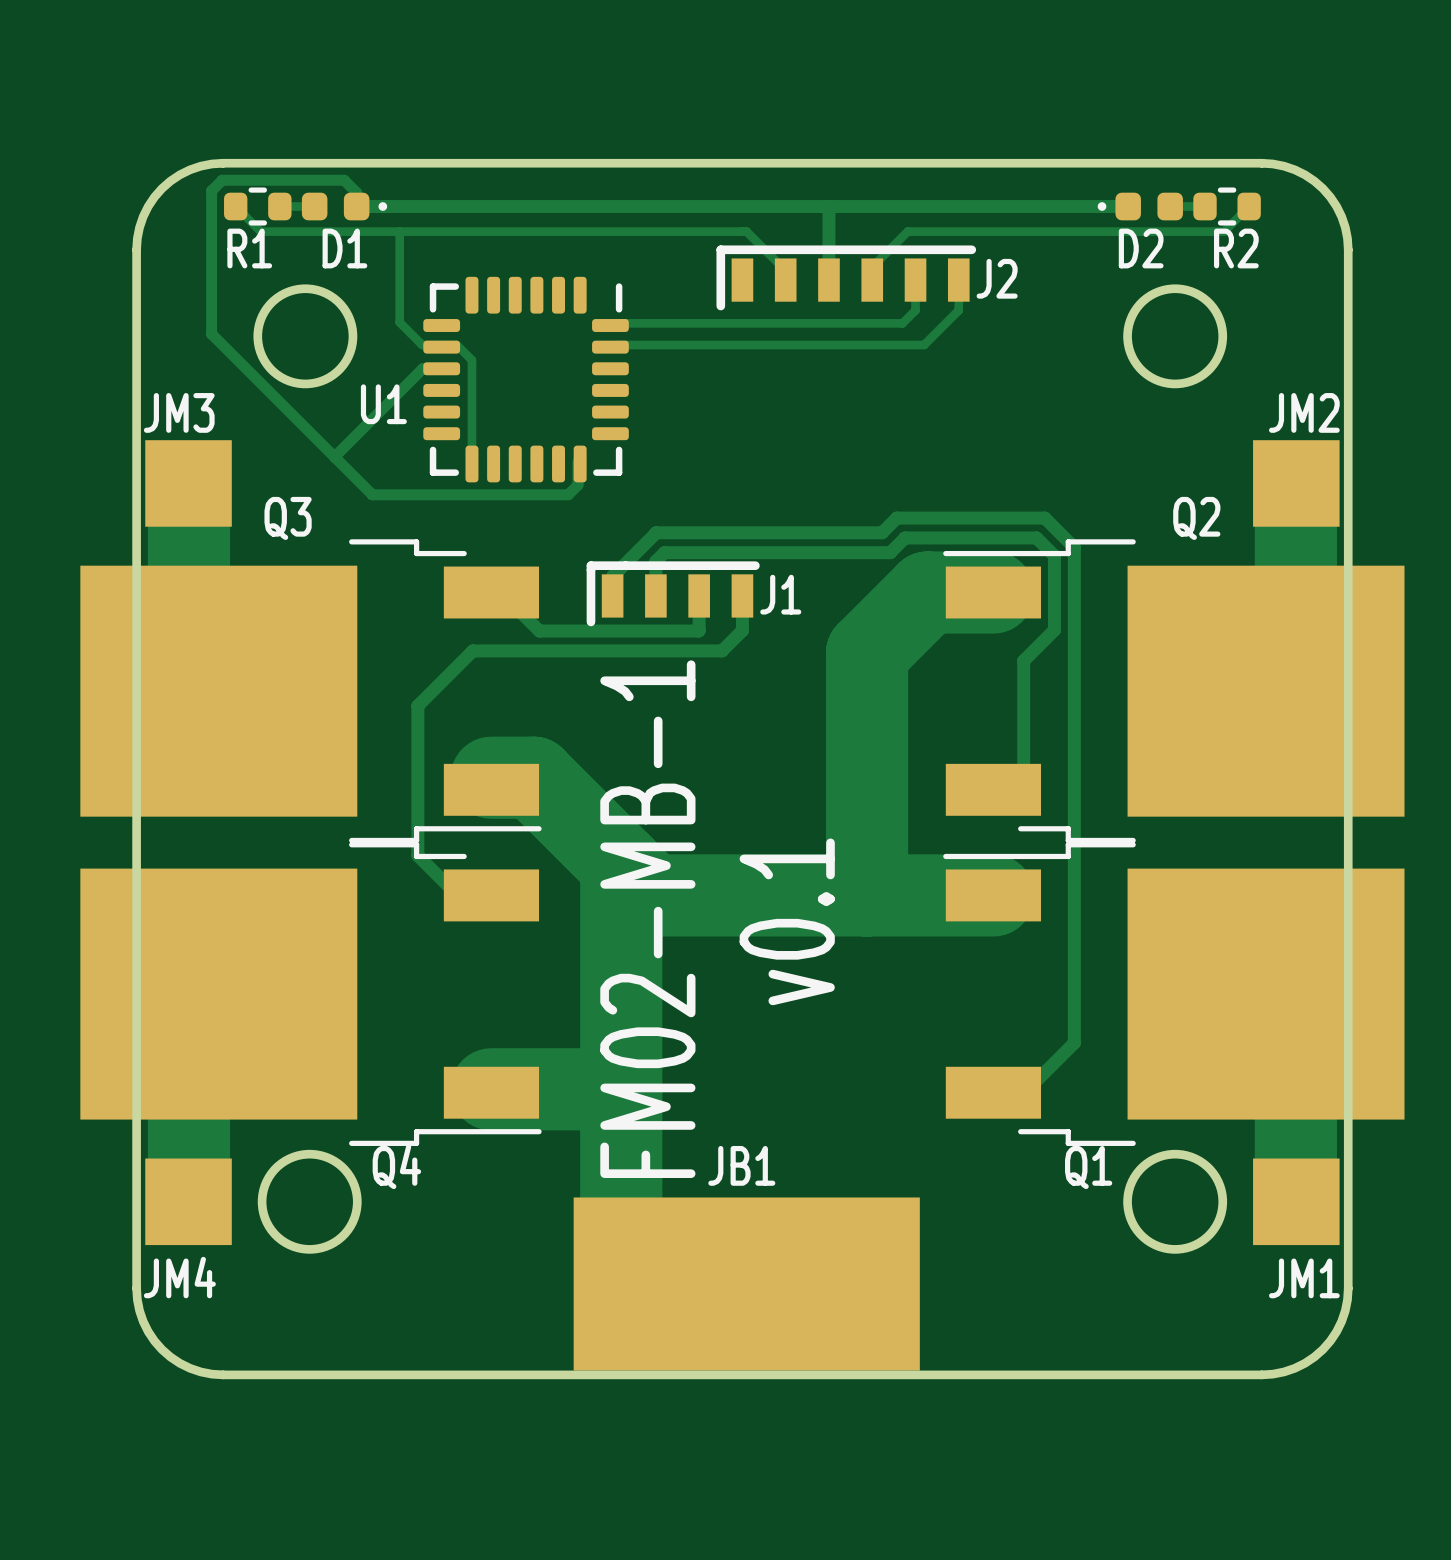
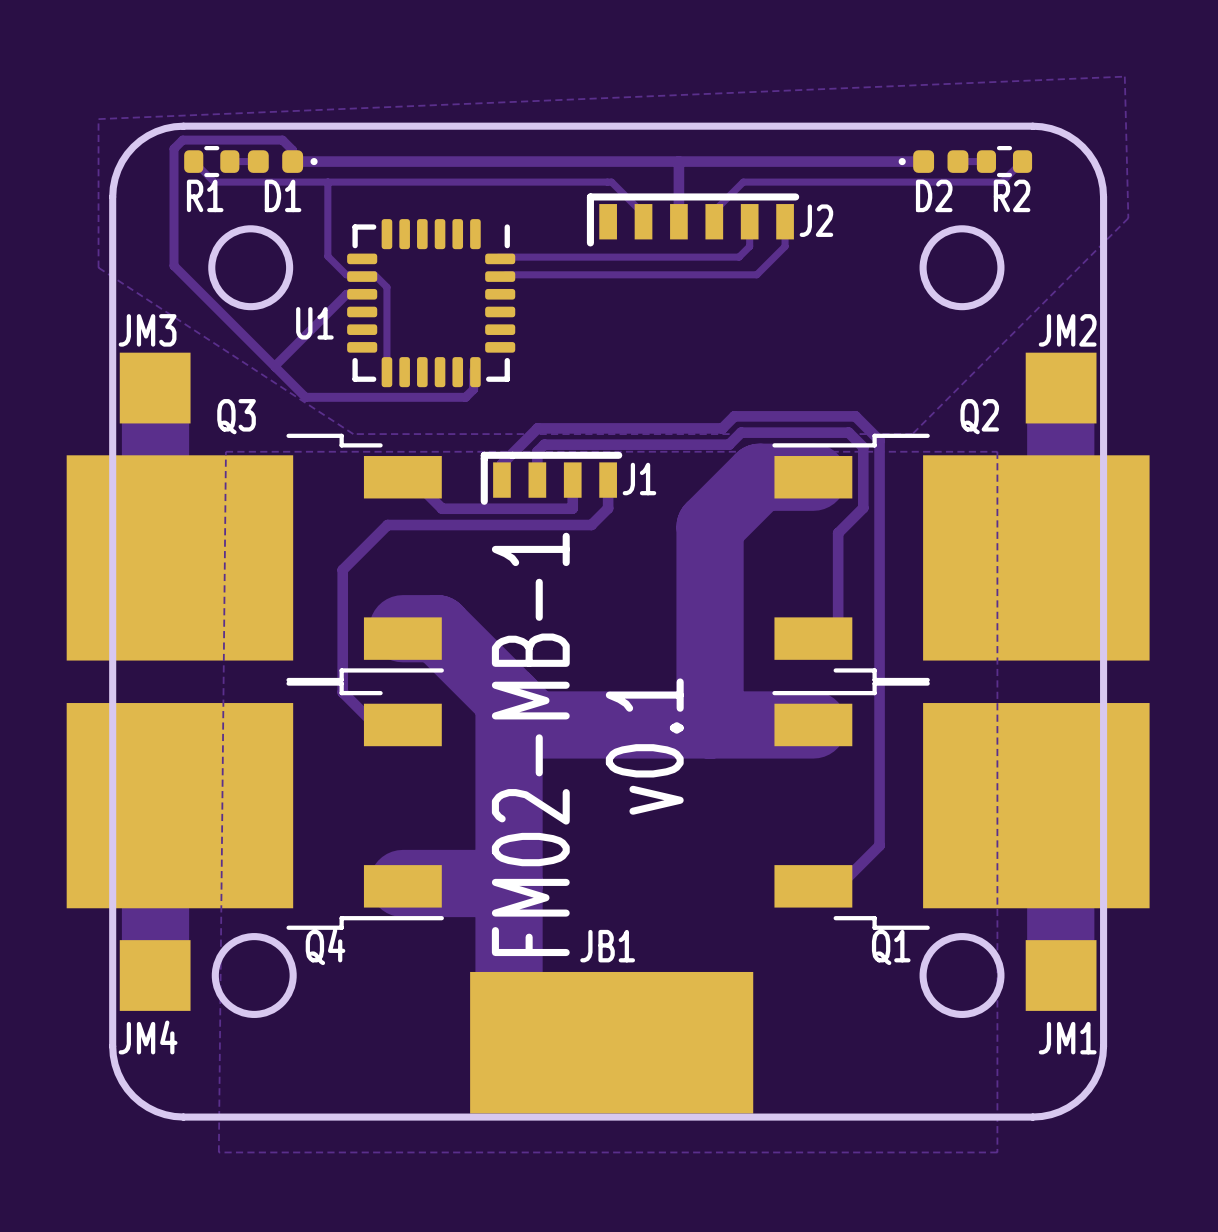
zone outline: none -> (1124, 76) (98, 119) (98, 267) (353, 434) (912, 434) (1128, 218) (1124, 76)
zone outline: none -> (225, 451) (218, 1152) (997, 1152) (997, 451) (225, 451)

